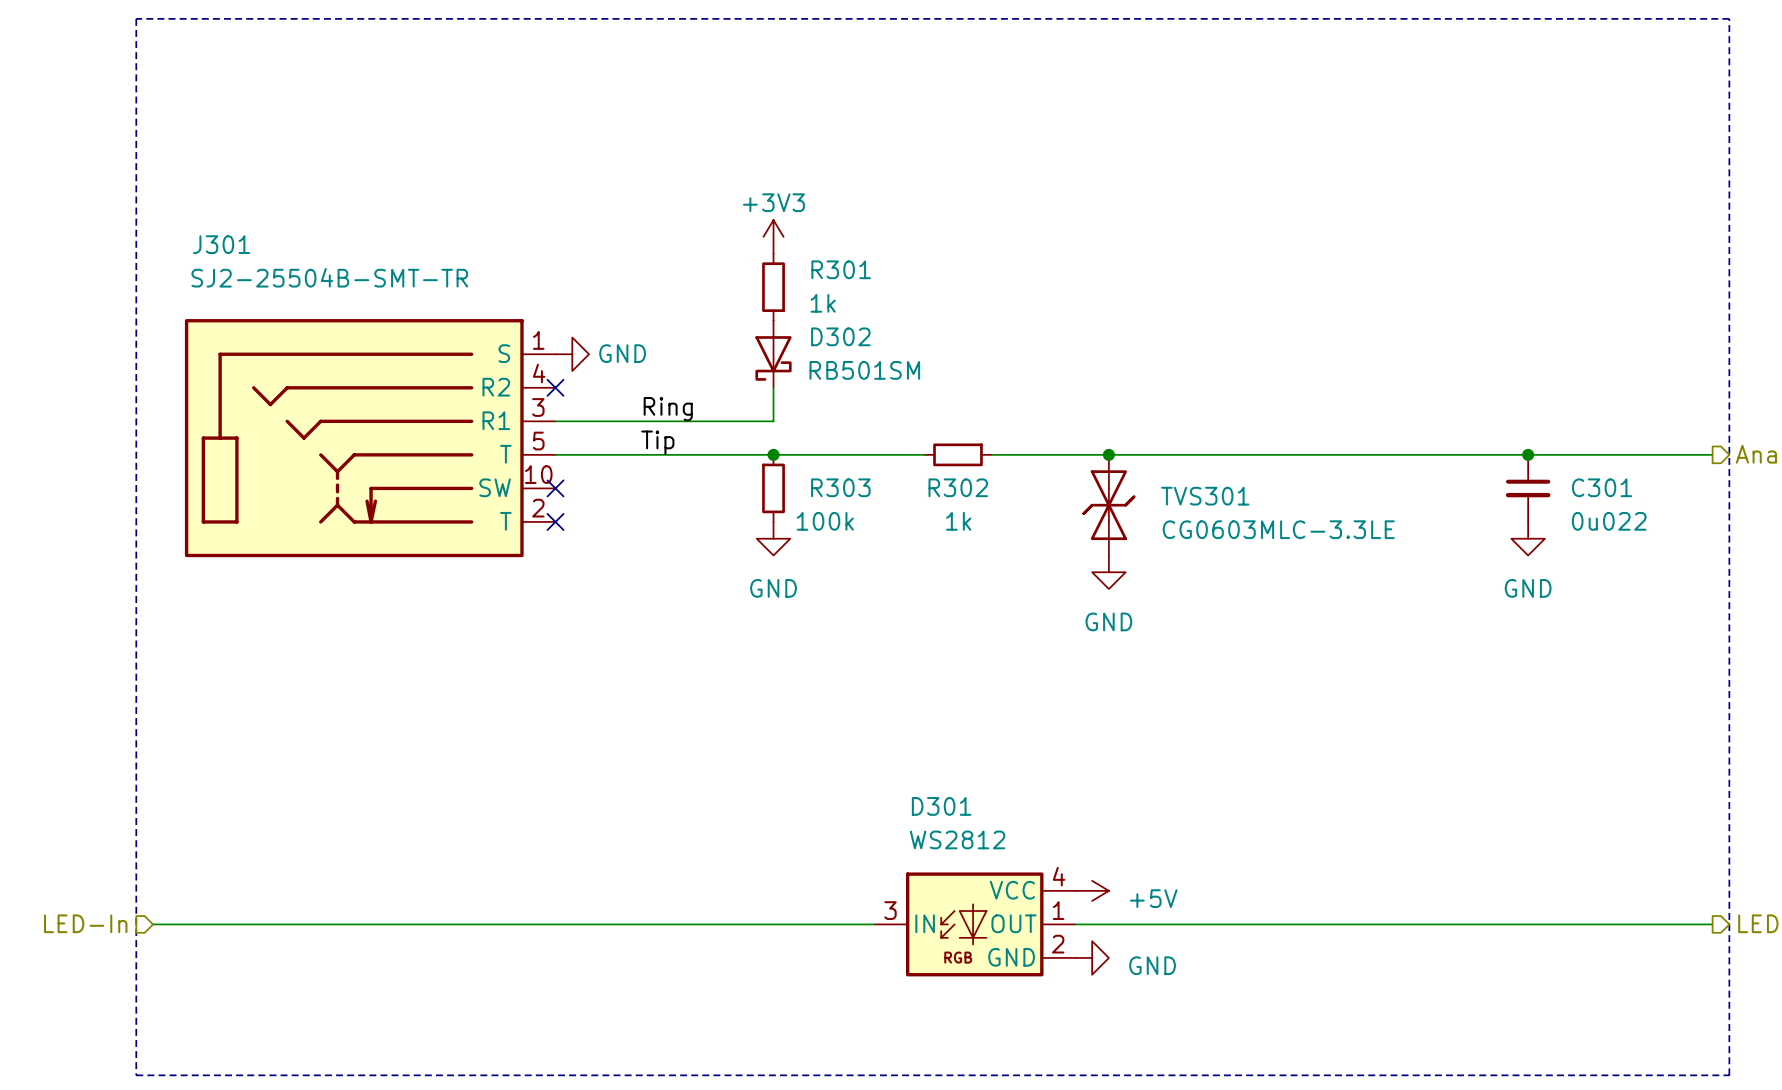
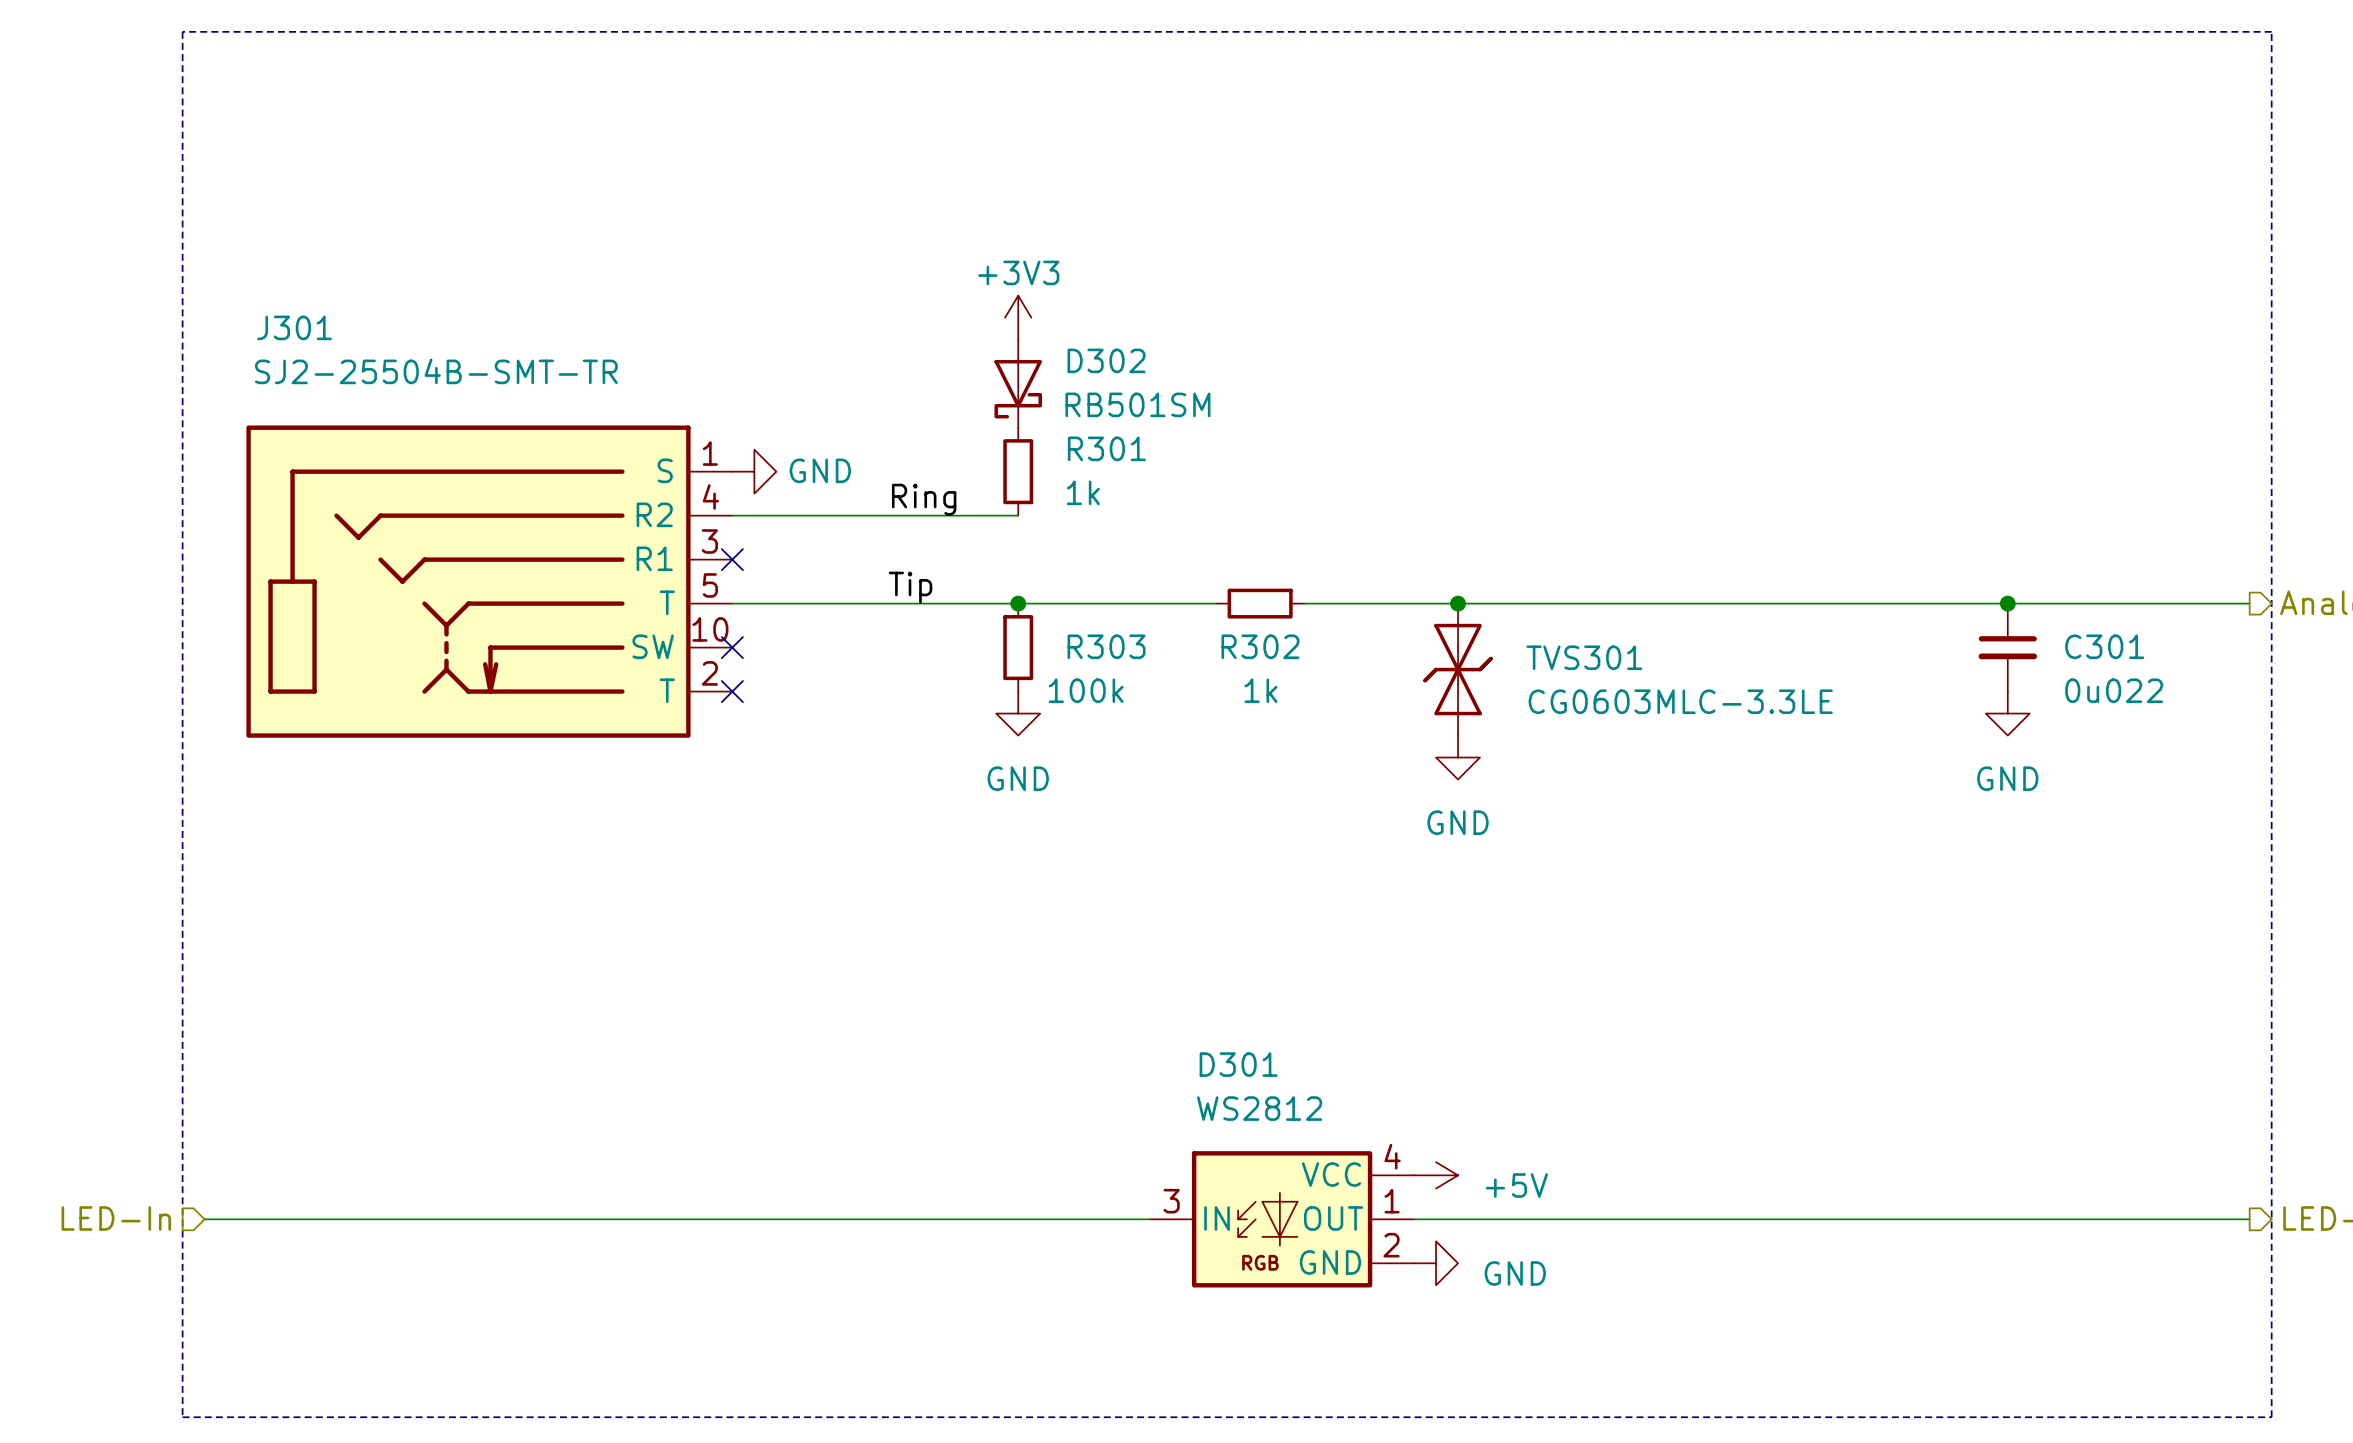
R301 position: (773, 287) -> (1018, 471)
D302 position: (773, 354) -> (1018, 383)
no-connect mark position: (555, 387) -> (732, 559)
wire: (773, 387) (773, 421) (555, 421) -> (1018, 515) (732, 515)
label position: Ring (668, 409) -> Ring (924, 499)
label position: Tip (657, 442) -> Tip (910, 587)

